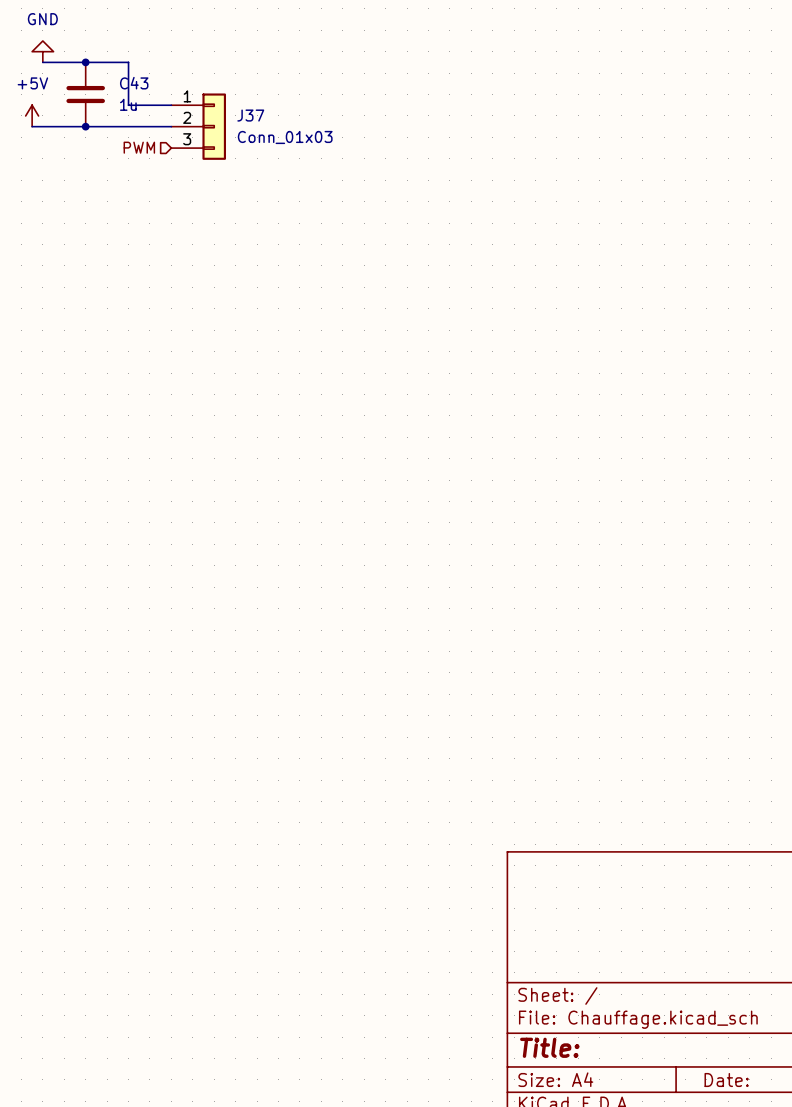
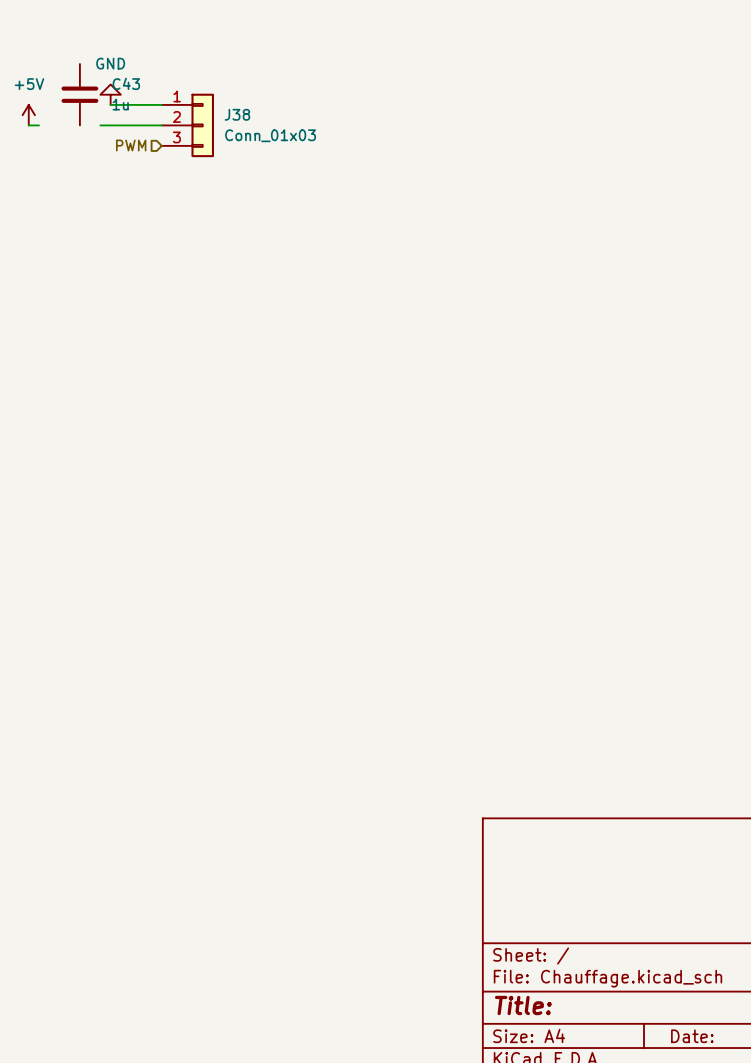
power symbol position: GND (42, 51) -> GND (110, 94)
wire: (42, 62) (128, 62) (128, 105) -> (110, 104) (120, 104)
junction: (85, 62) -> none
J37 name: J37 (250, 115) -> J38 (237, 114)
wire: (42, 126) (107, 126) -> none
junction: (85, 126) -> none

